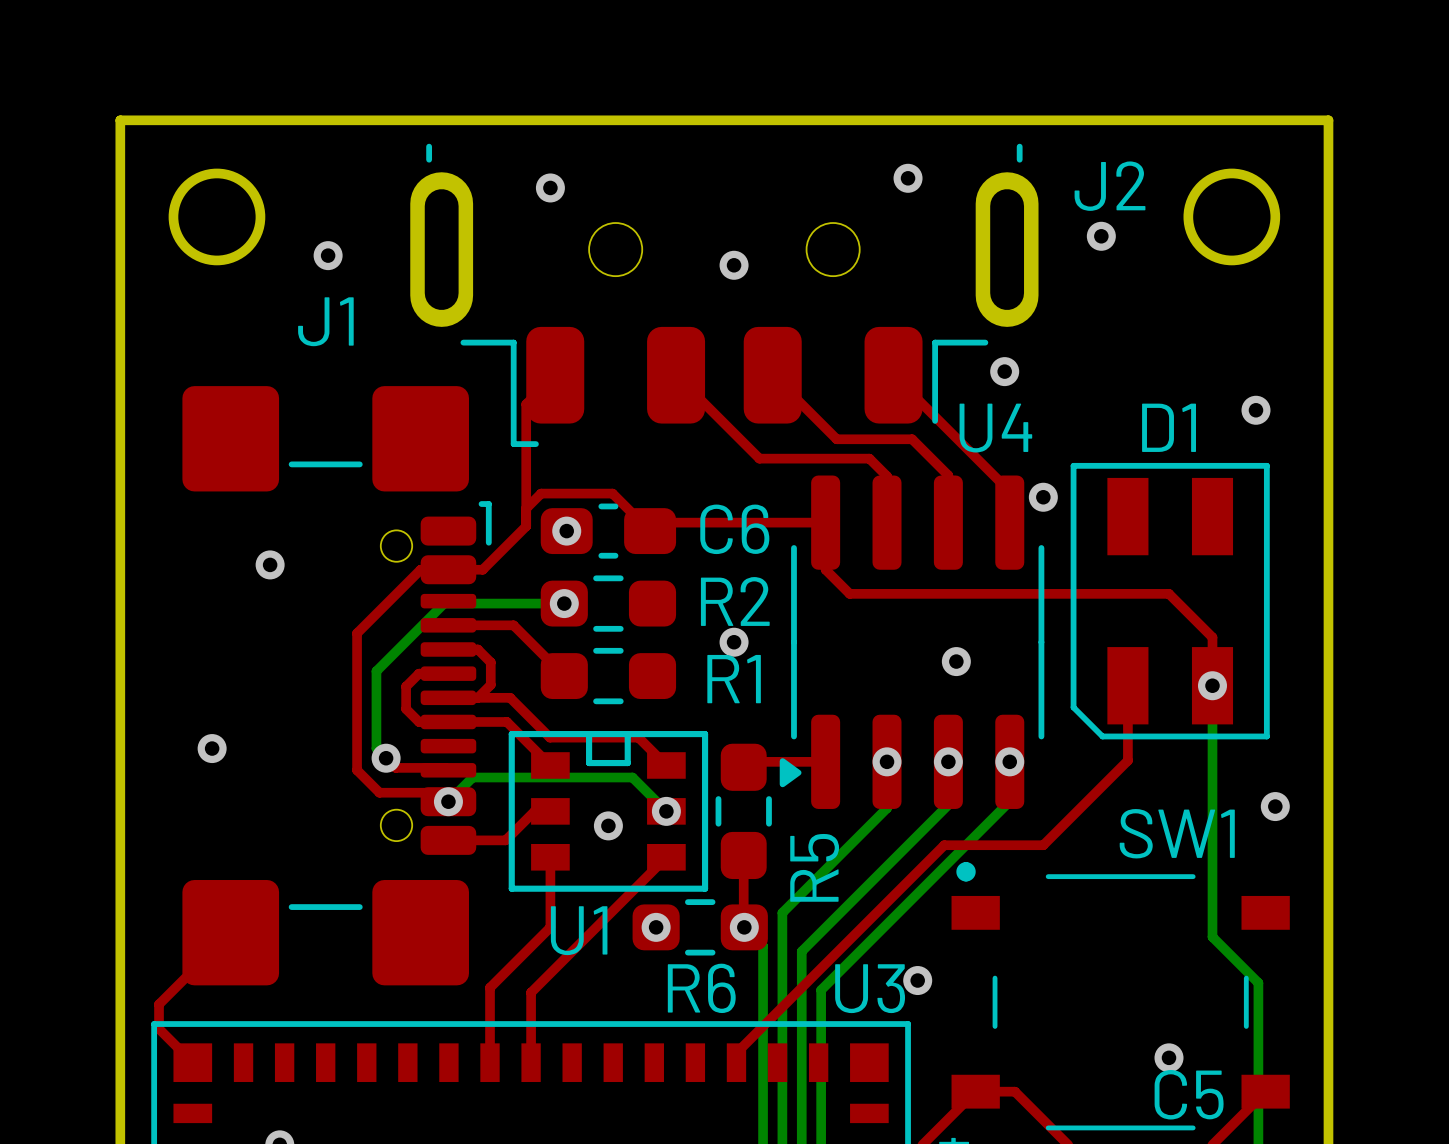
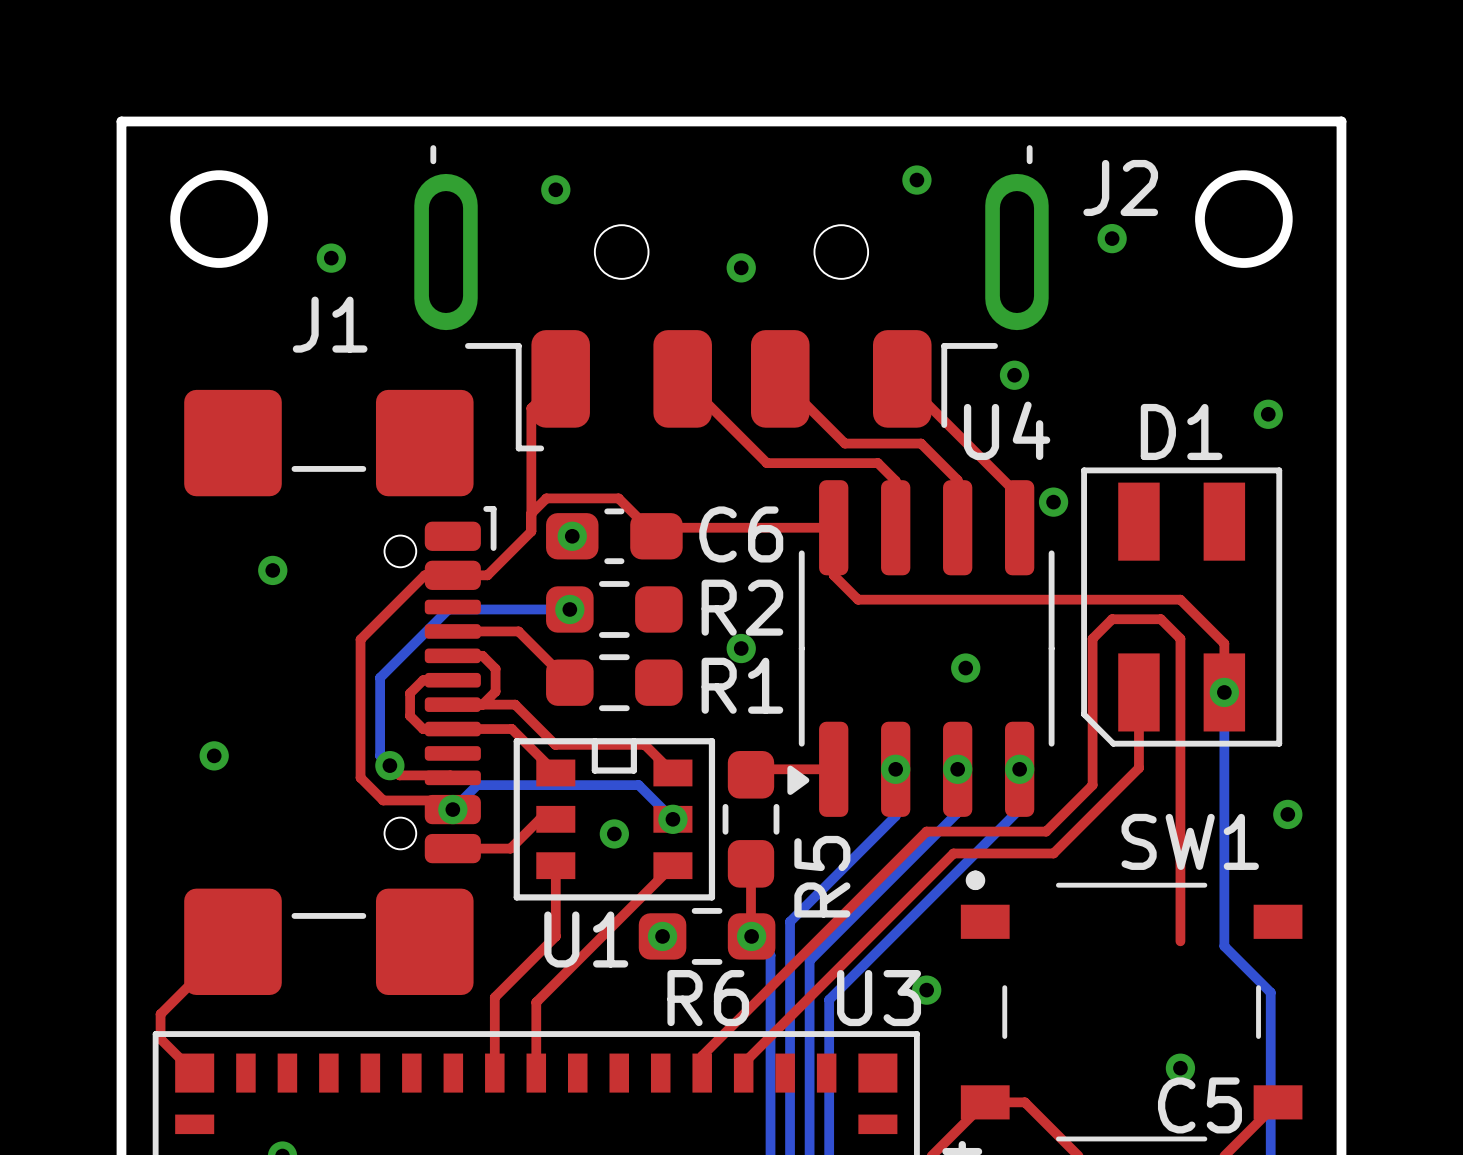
top track: none -> (1180, 941) (1180, 638) (1160, 619) (1112, 619) (1092, 638) (1092, 785) (1046, 831) (926, 831) (702, 1055) (702, 1073)

